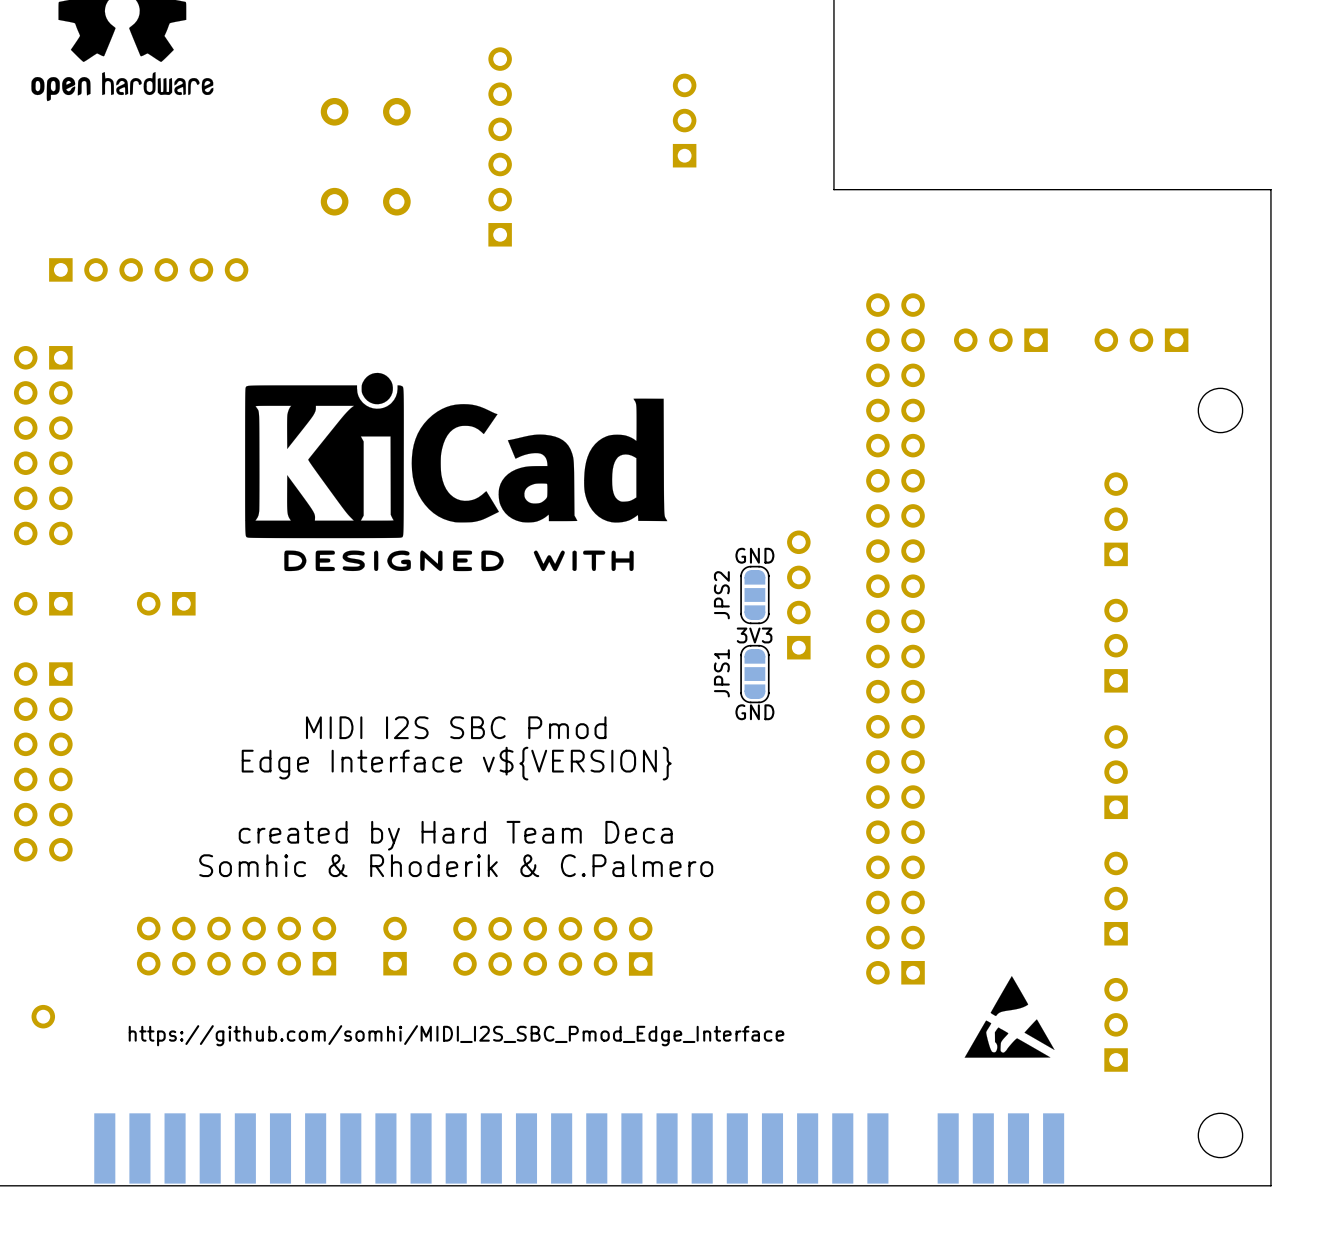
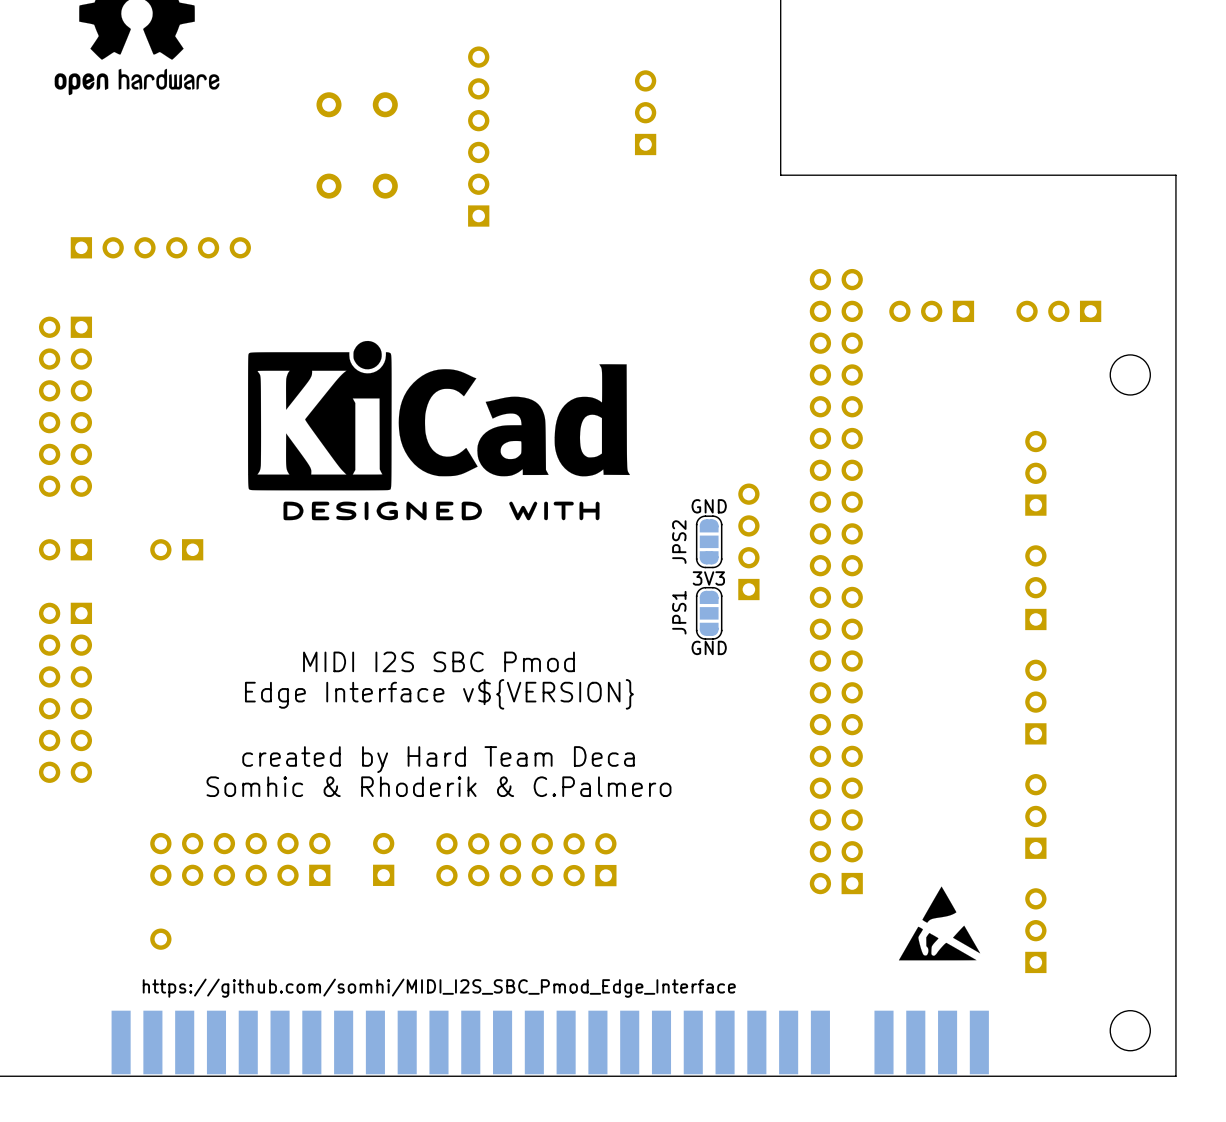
part position: (43, 1016) -> (160, 939)
text position: https://github.com/somhi/MIDI_I2S_SBC_Pmod_Edge_Interface (456, 1035) -> https://github.com/somhi/MIDI_I2S_SBC_Pmod_Edge_Interface (439, 988)

